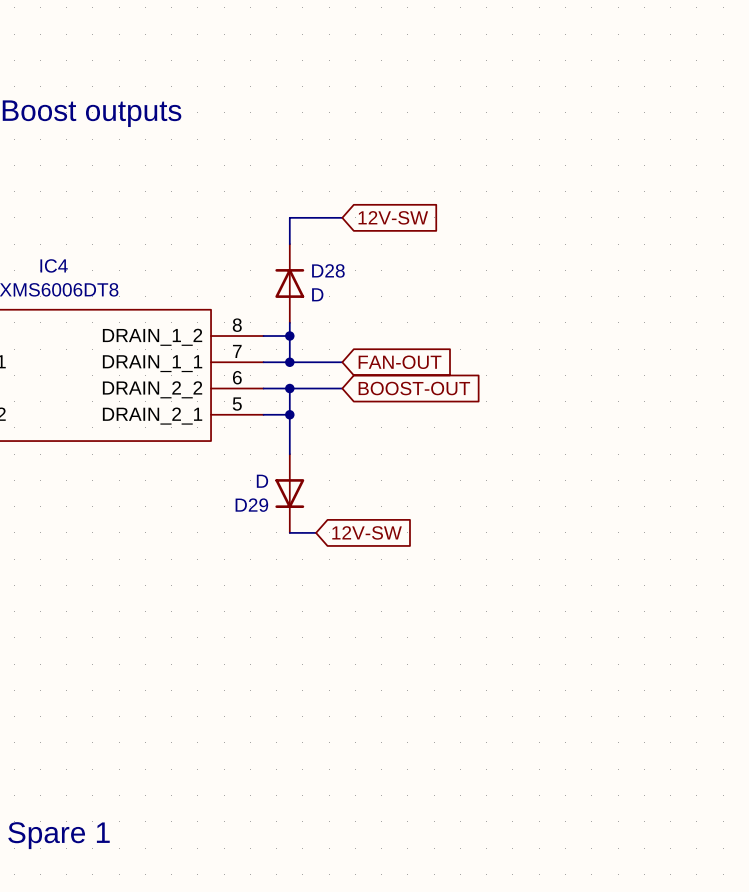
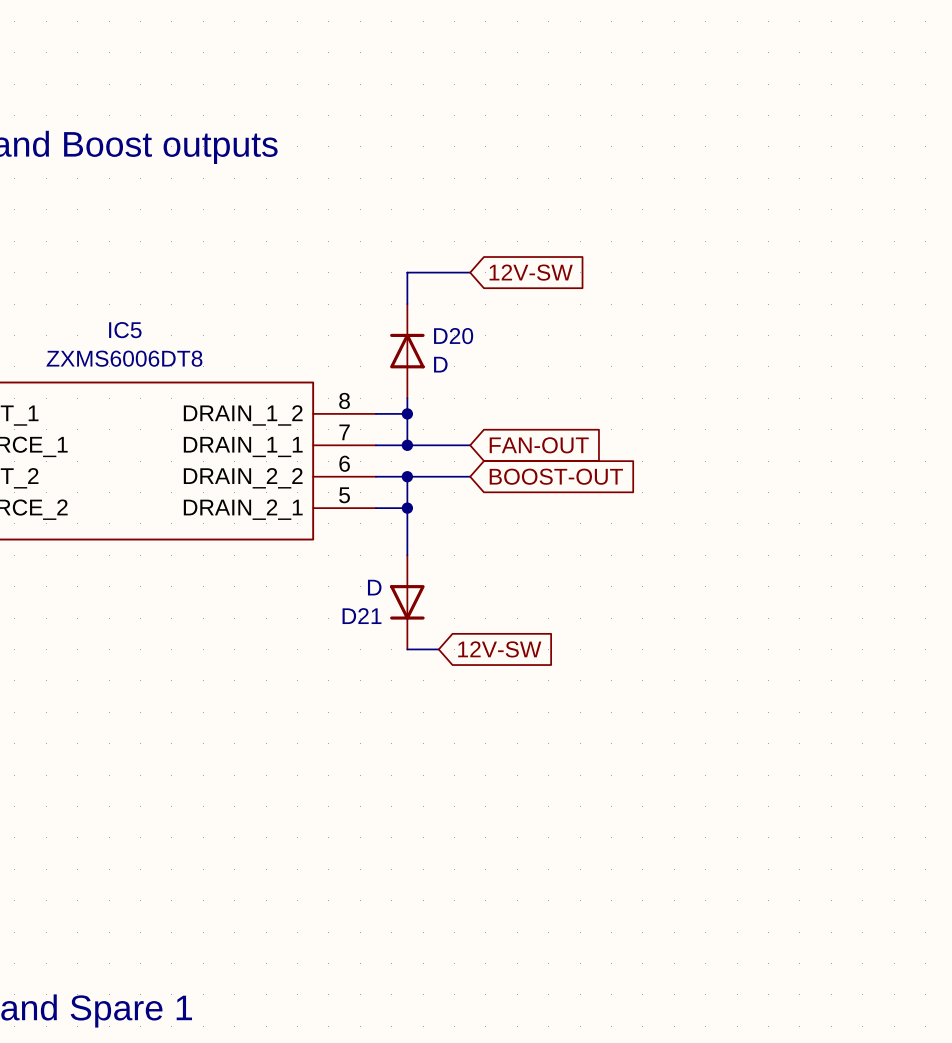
IC4 name: IC4 (54, 265) -> IC5 (125, 330)
D28 name: D28 (328, 270) -> D20 (453, 336)
D29 name: D29 (251, 505) -> D21 (362, 616)

